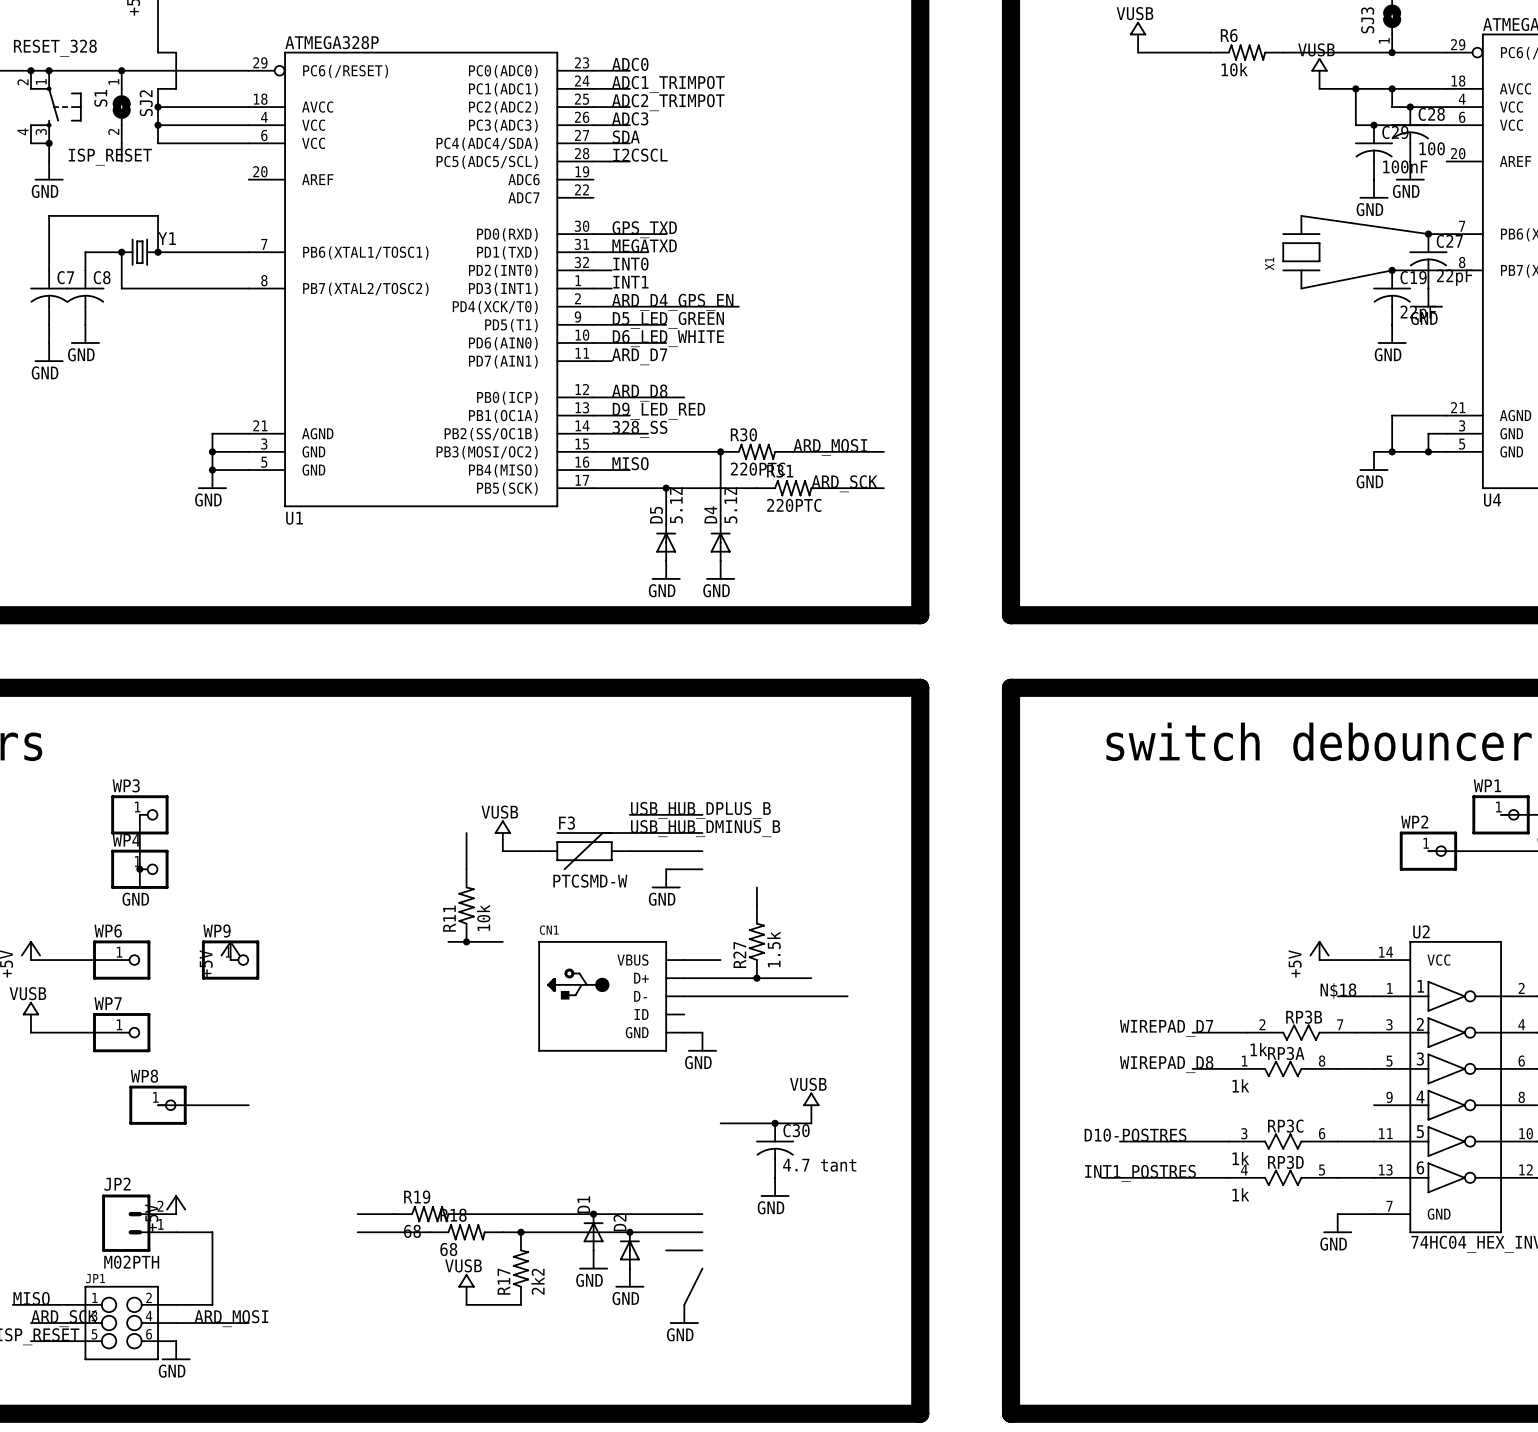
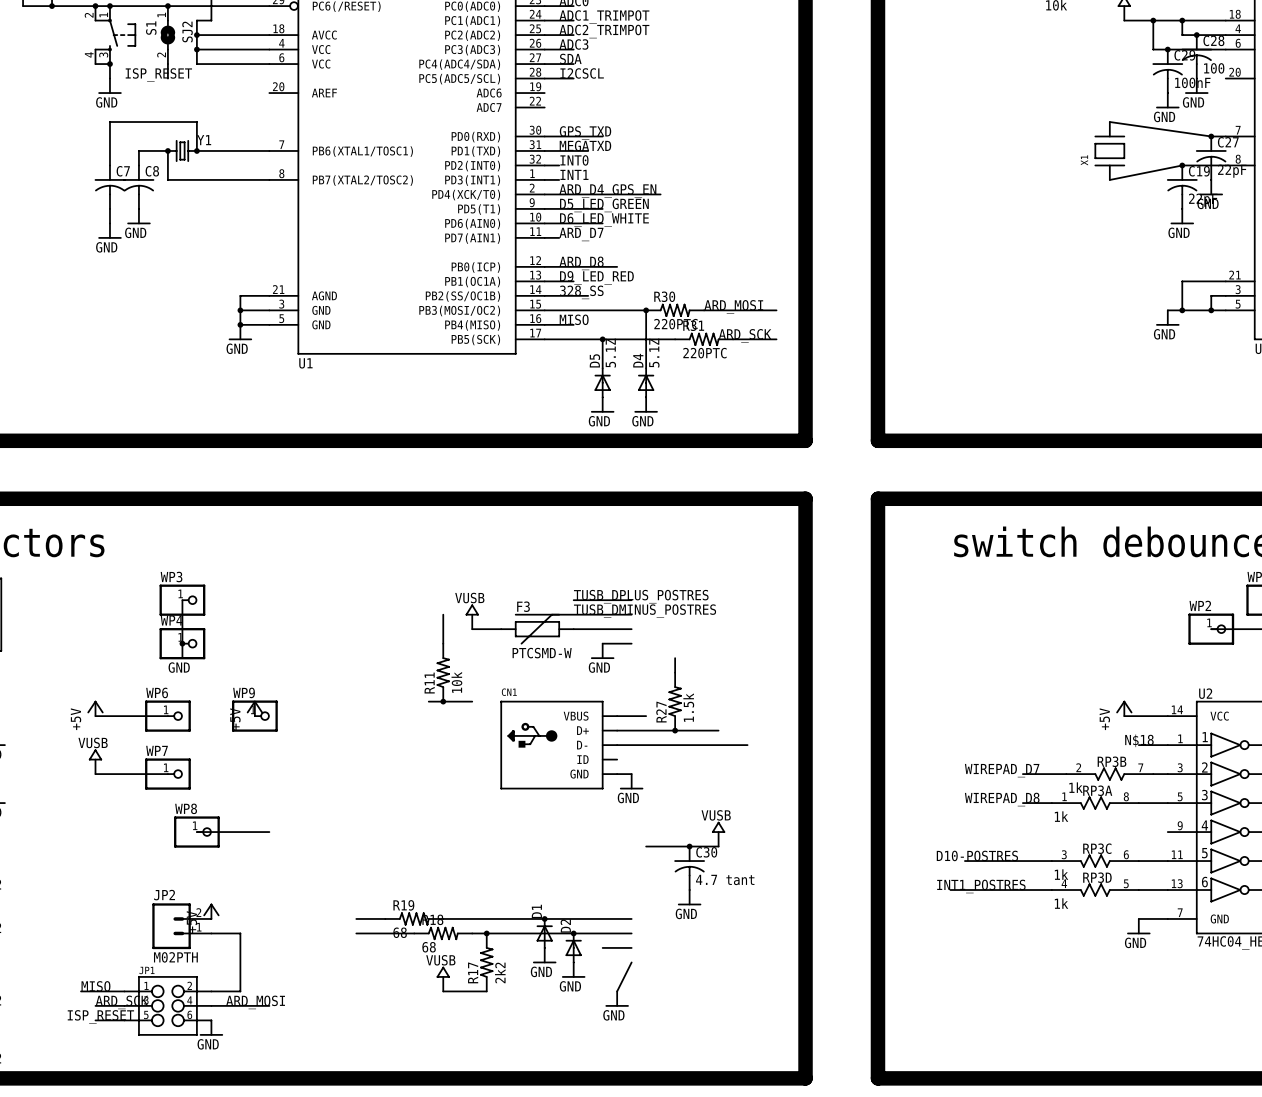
label: USB_HUB_DPLUS_B (700, 810) -> TUSB_DPLUS_POSTRES (641, 596)
label: USB_HUB_DMINUS_B (705, 828) -> TUSB_DMINUS_POSTRES (645, 611)

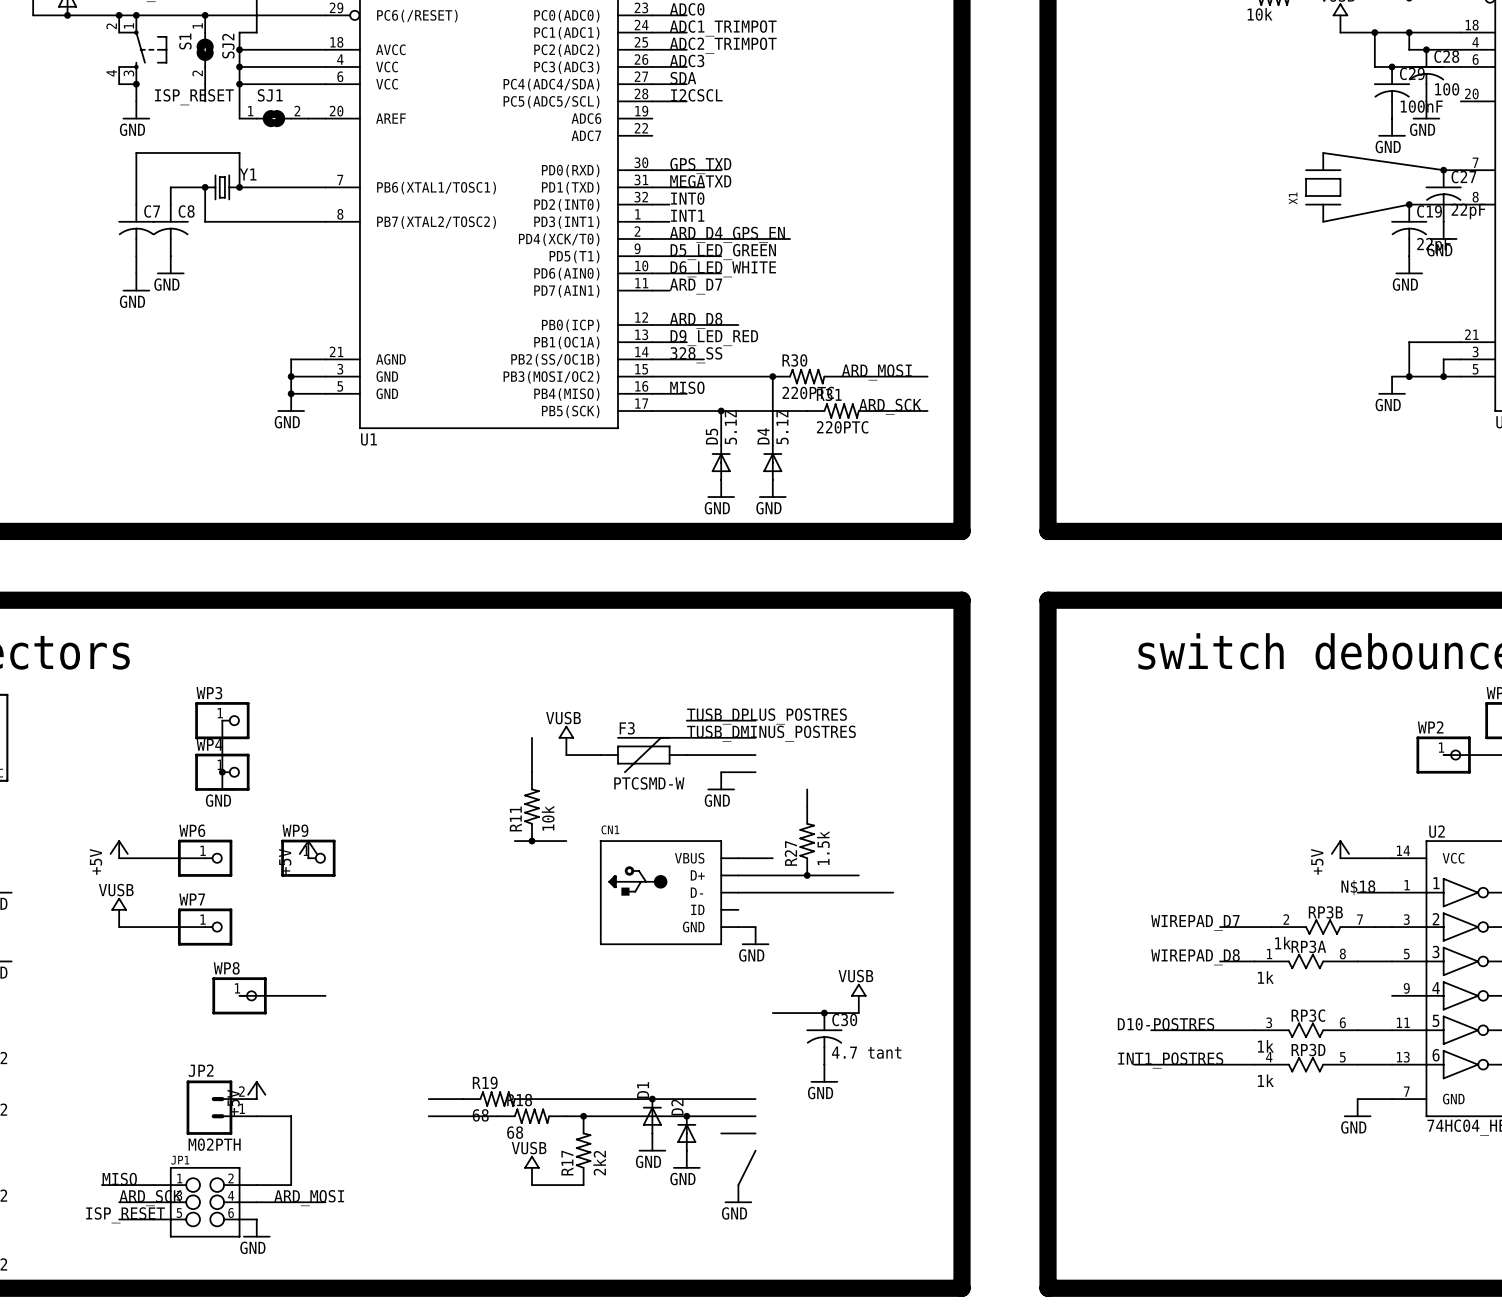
wire: none -> (239, 84) (239, 118)
junction: none -> (239, 84)
SJ1: none -> (273, 118)
wire: none -> (308, 118) (325, 118)

